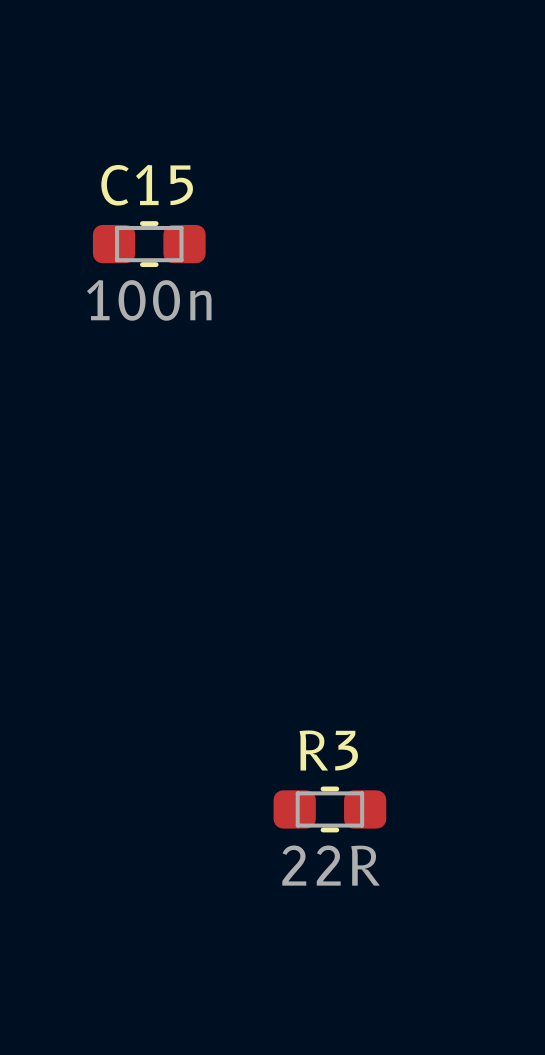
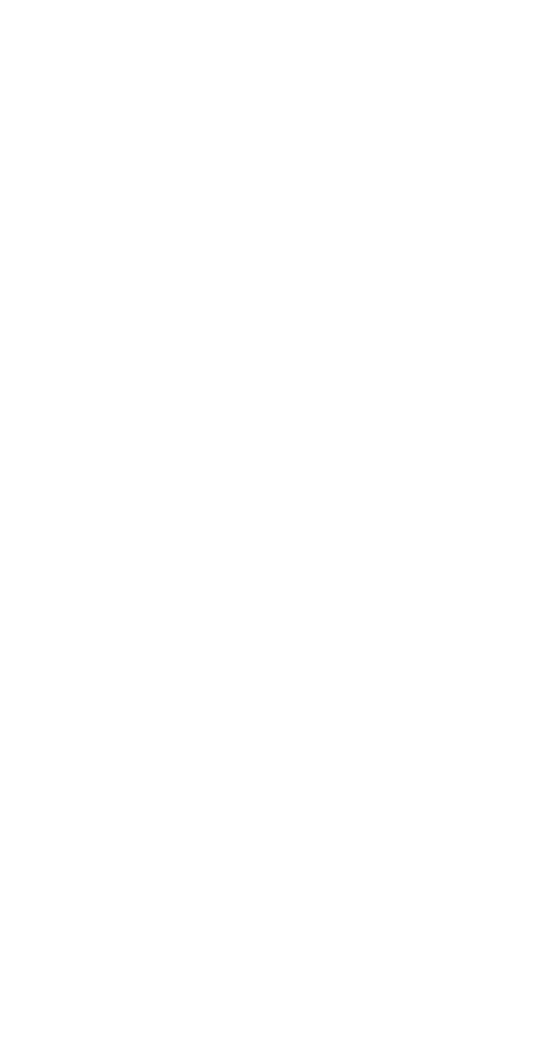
C15: 100n (149, 244) -> none
R3: 22R (329, 809) -> none

